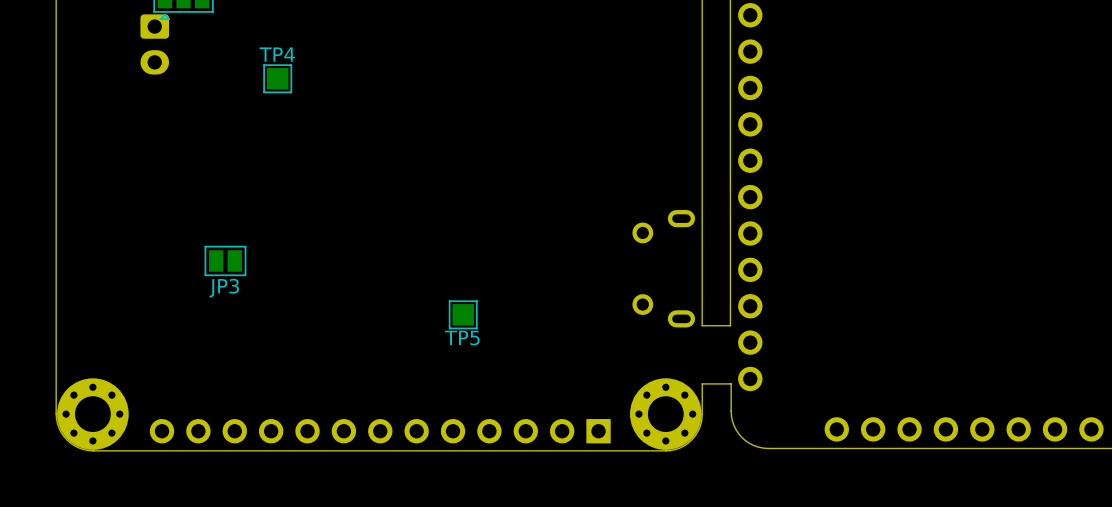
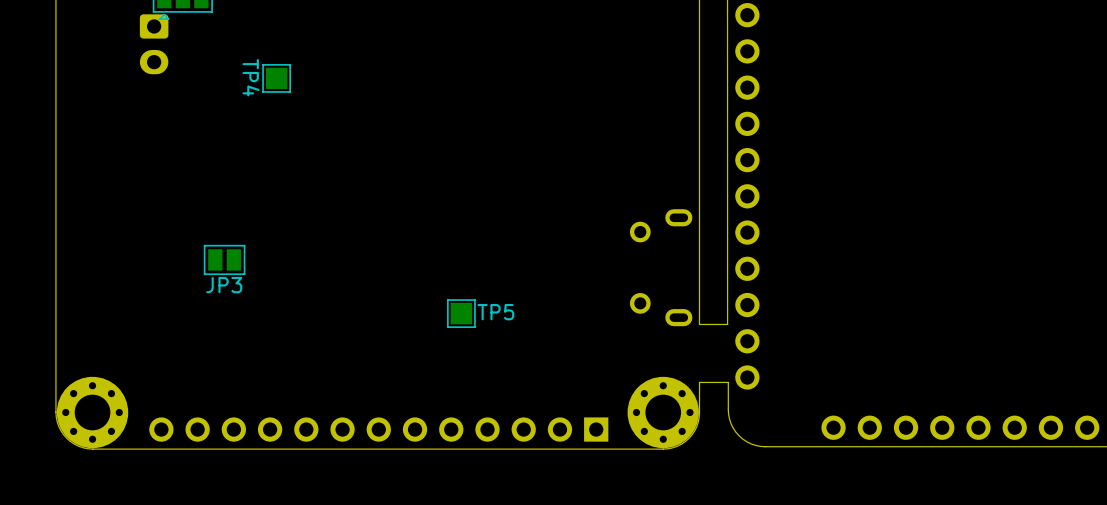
TP4 name rotation: 0° (277, 54) -> 90° clockwise (251, 77)
TP5 name position: TP5 (462, 338) -> TP5 (495, 312)

